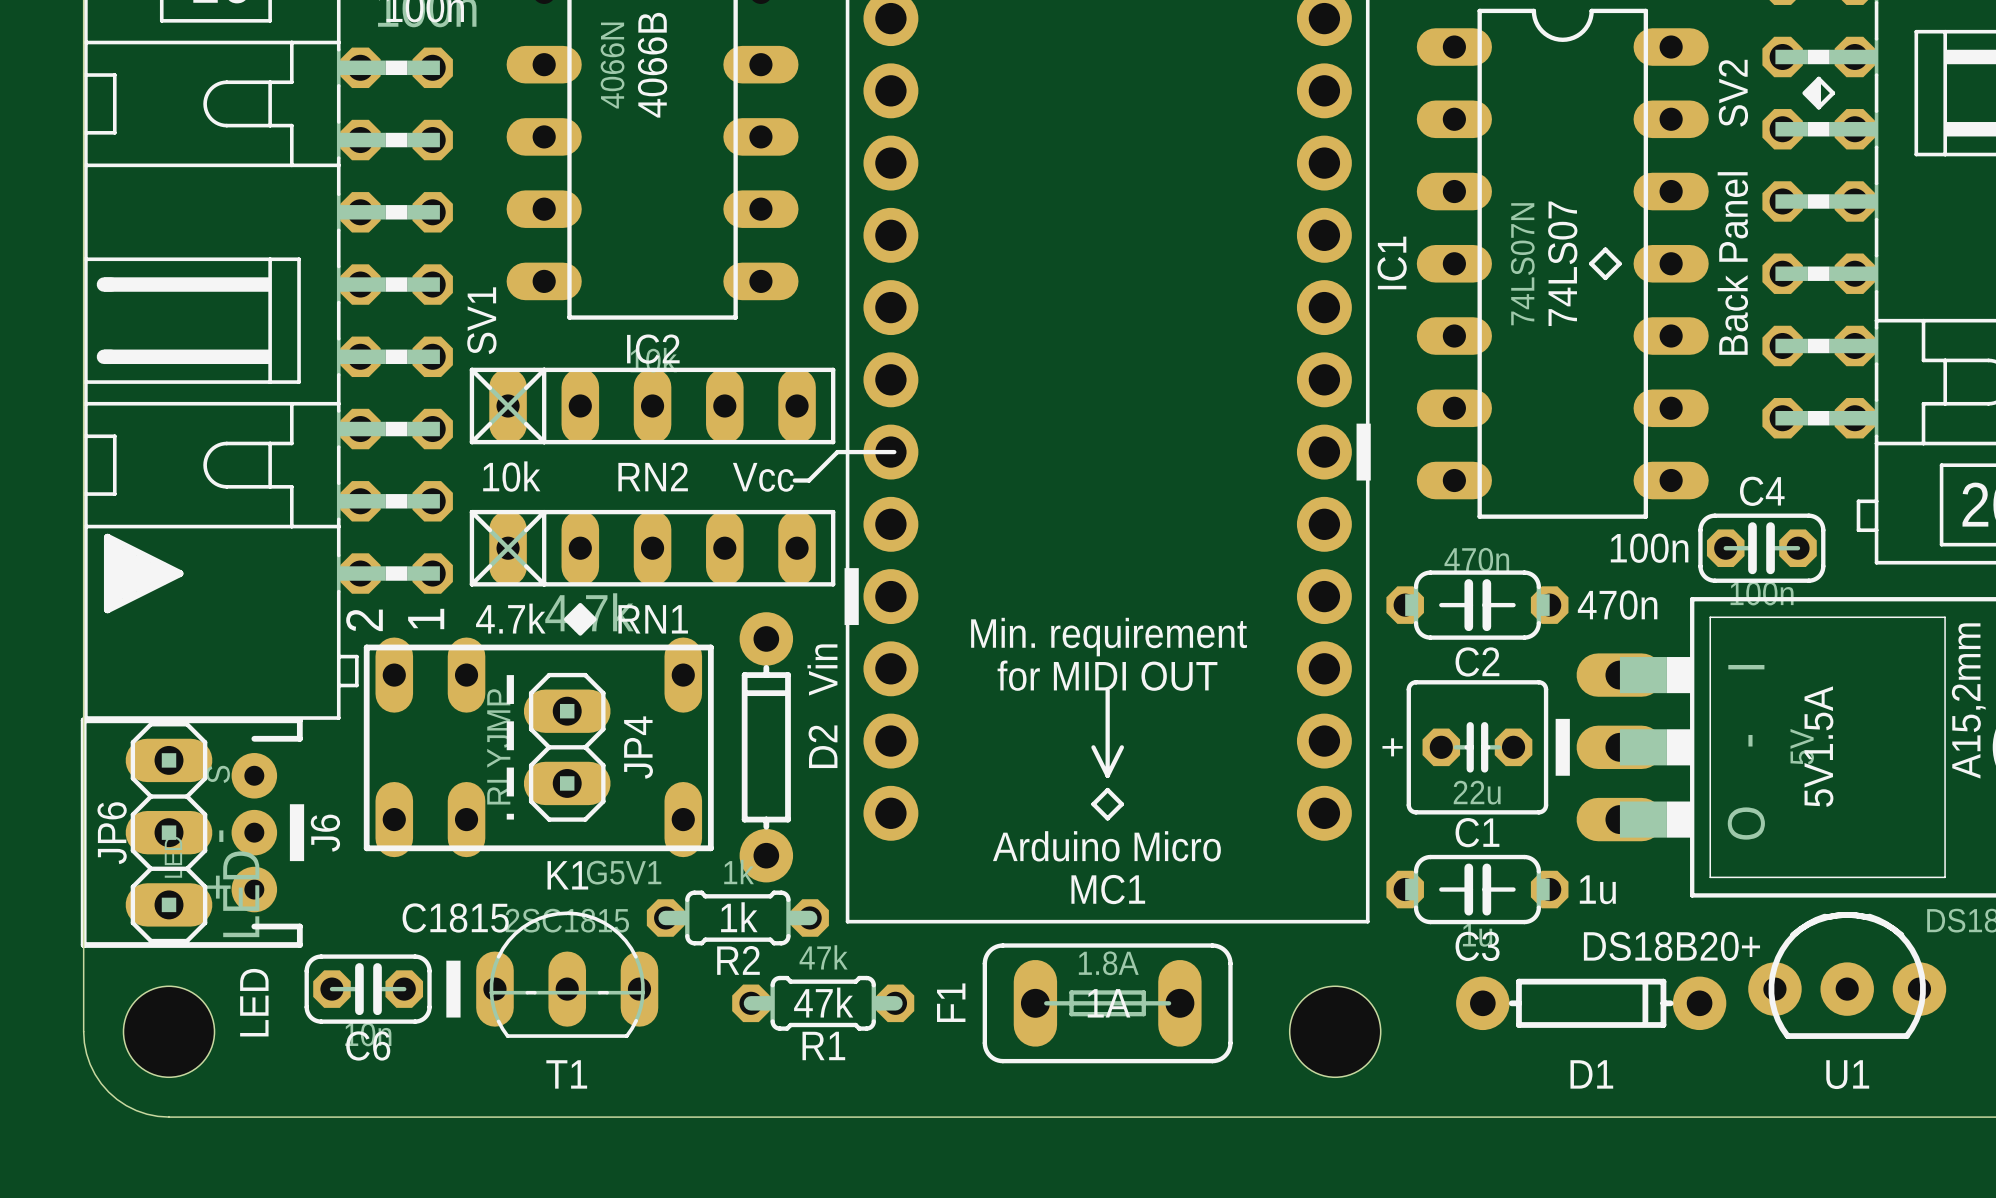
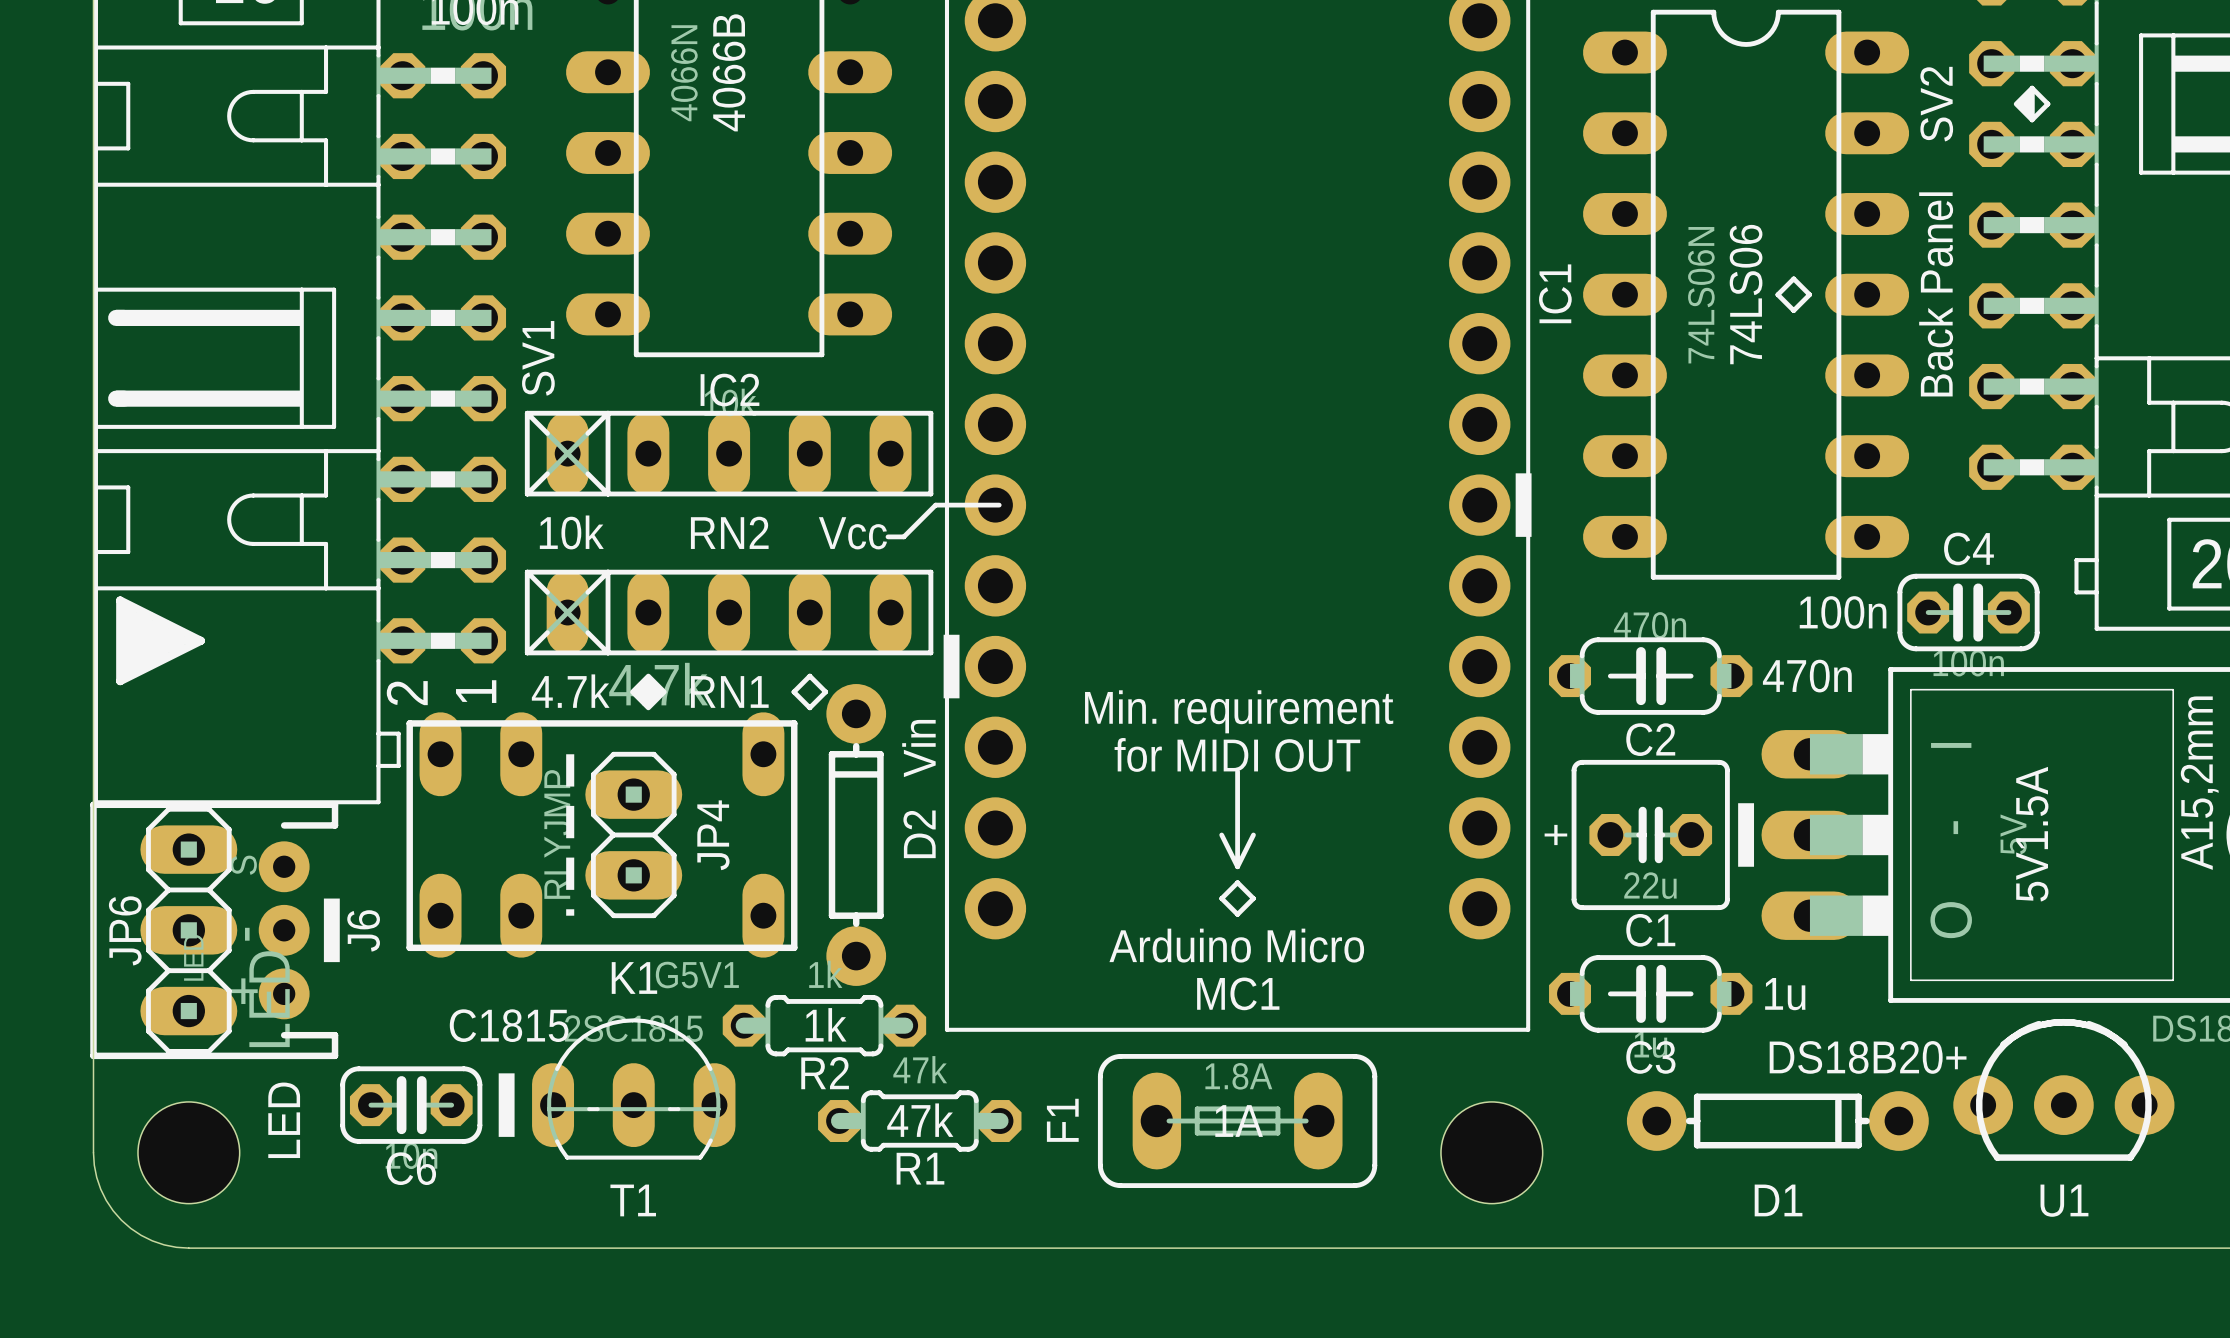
text: 74LS07 (1562, 263) -> 74LS06 (1746, 294)
IC1 value: 74LS07N (1522, 264) -> 74LS06N (1701, 295)
line: none -> (809, 676) (793, 691) (809, 707) (825, 691) (809, 676)

